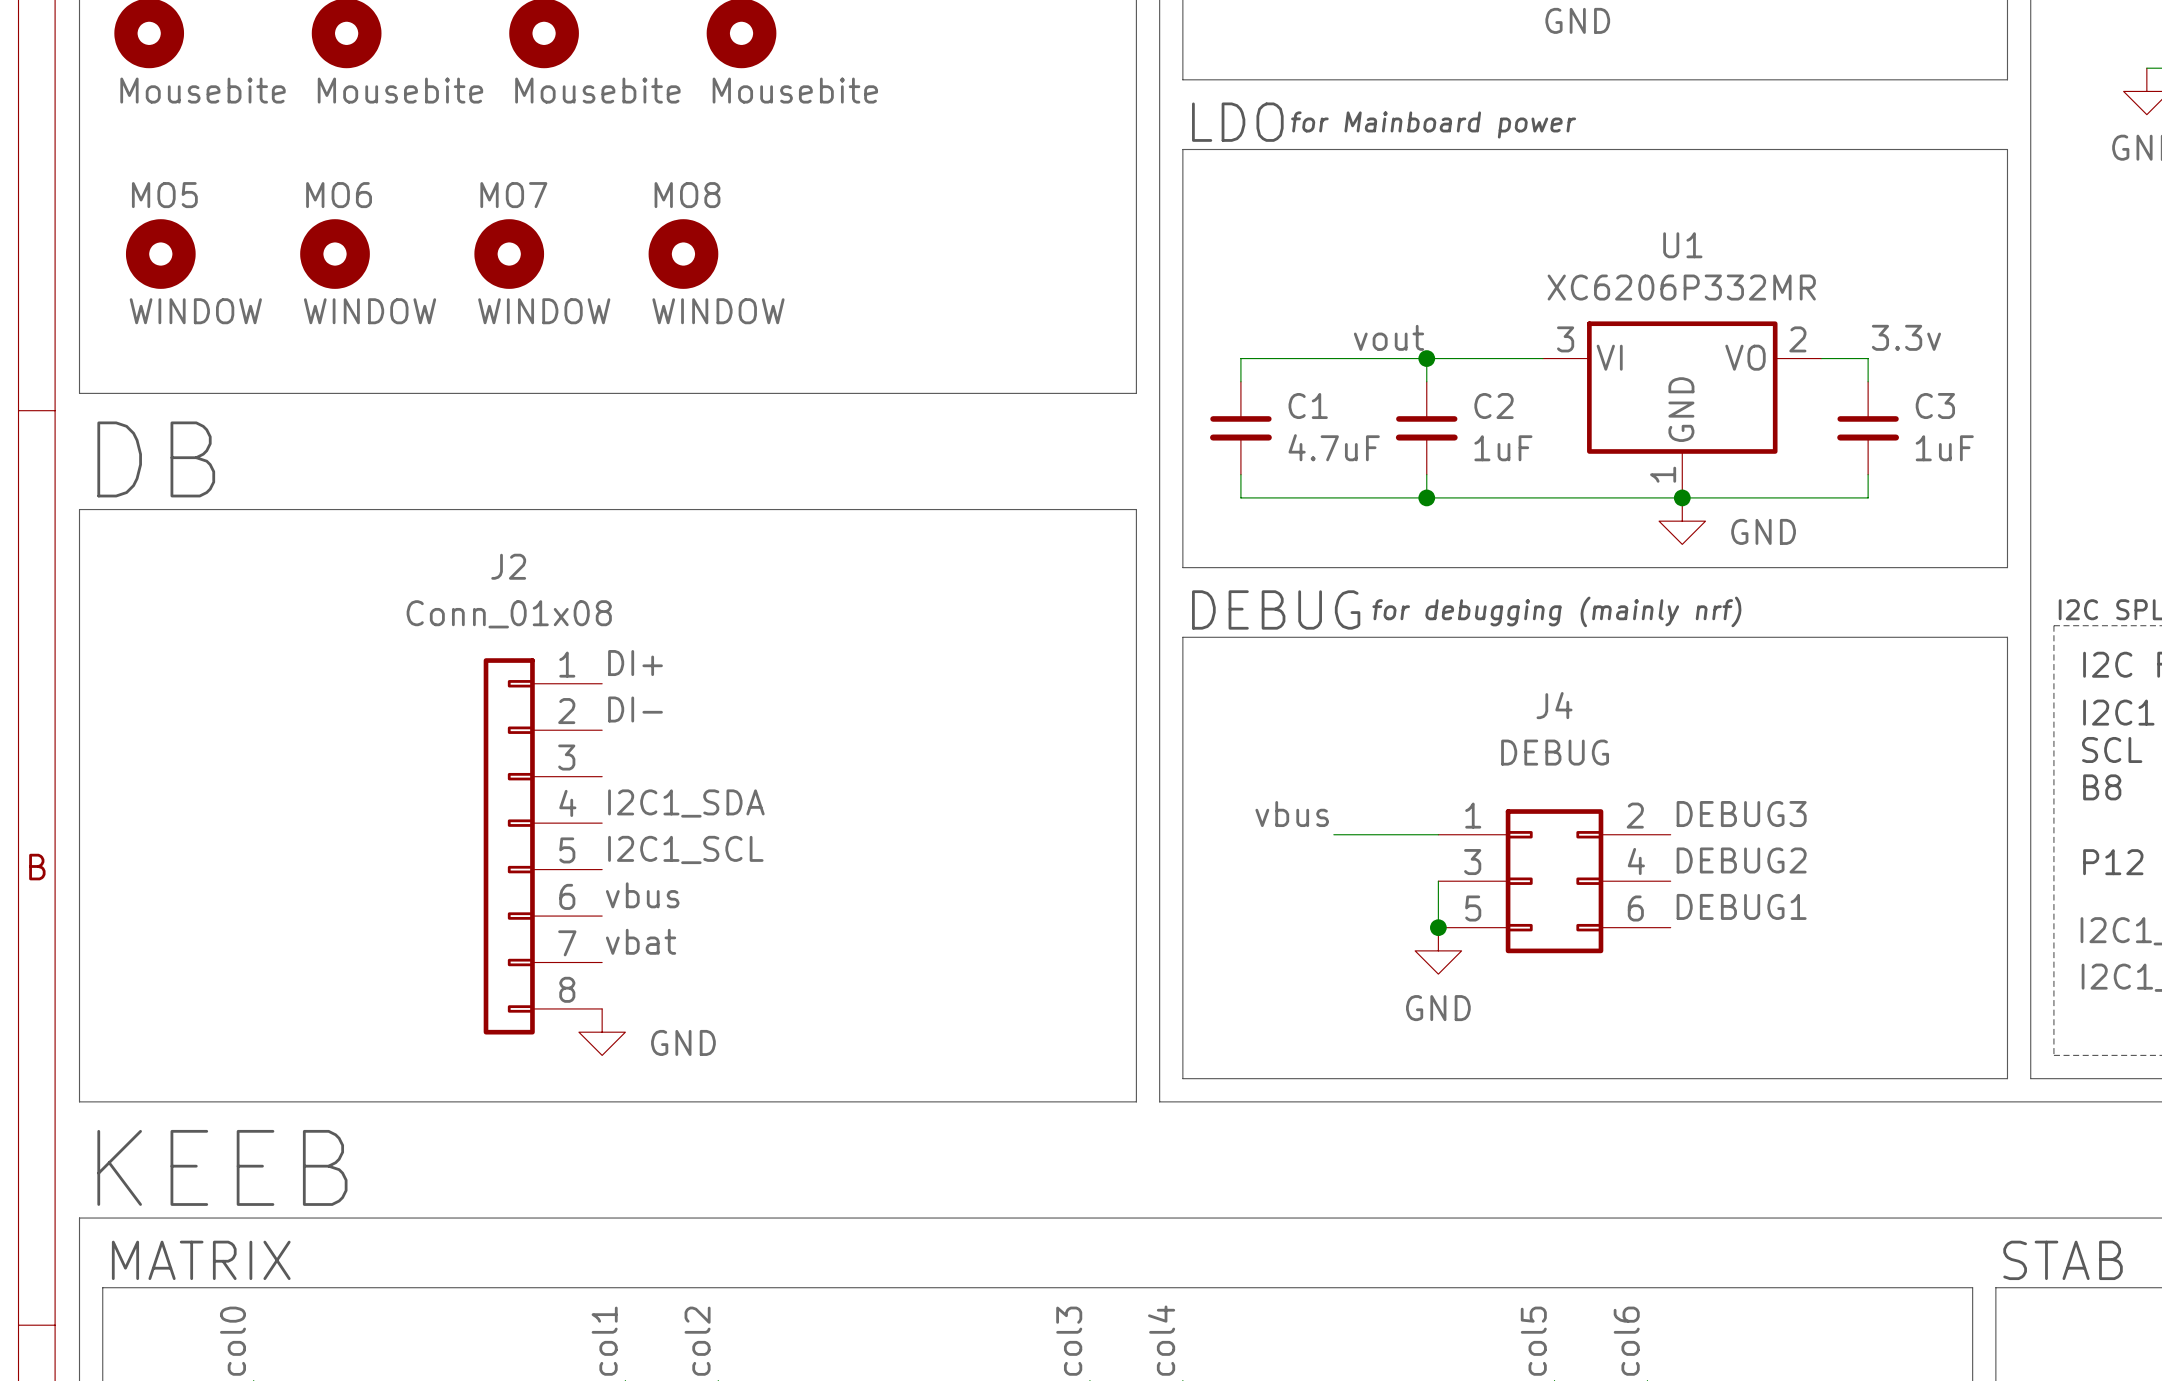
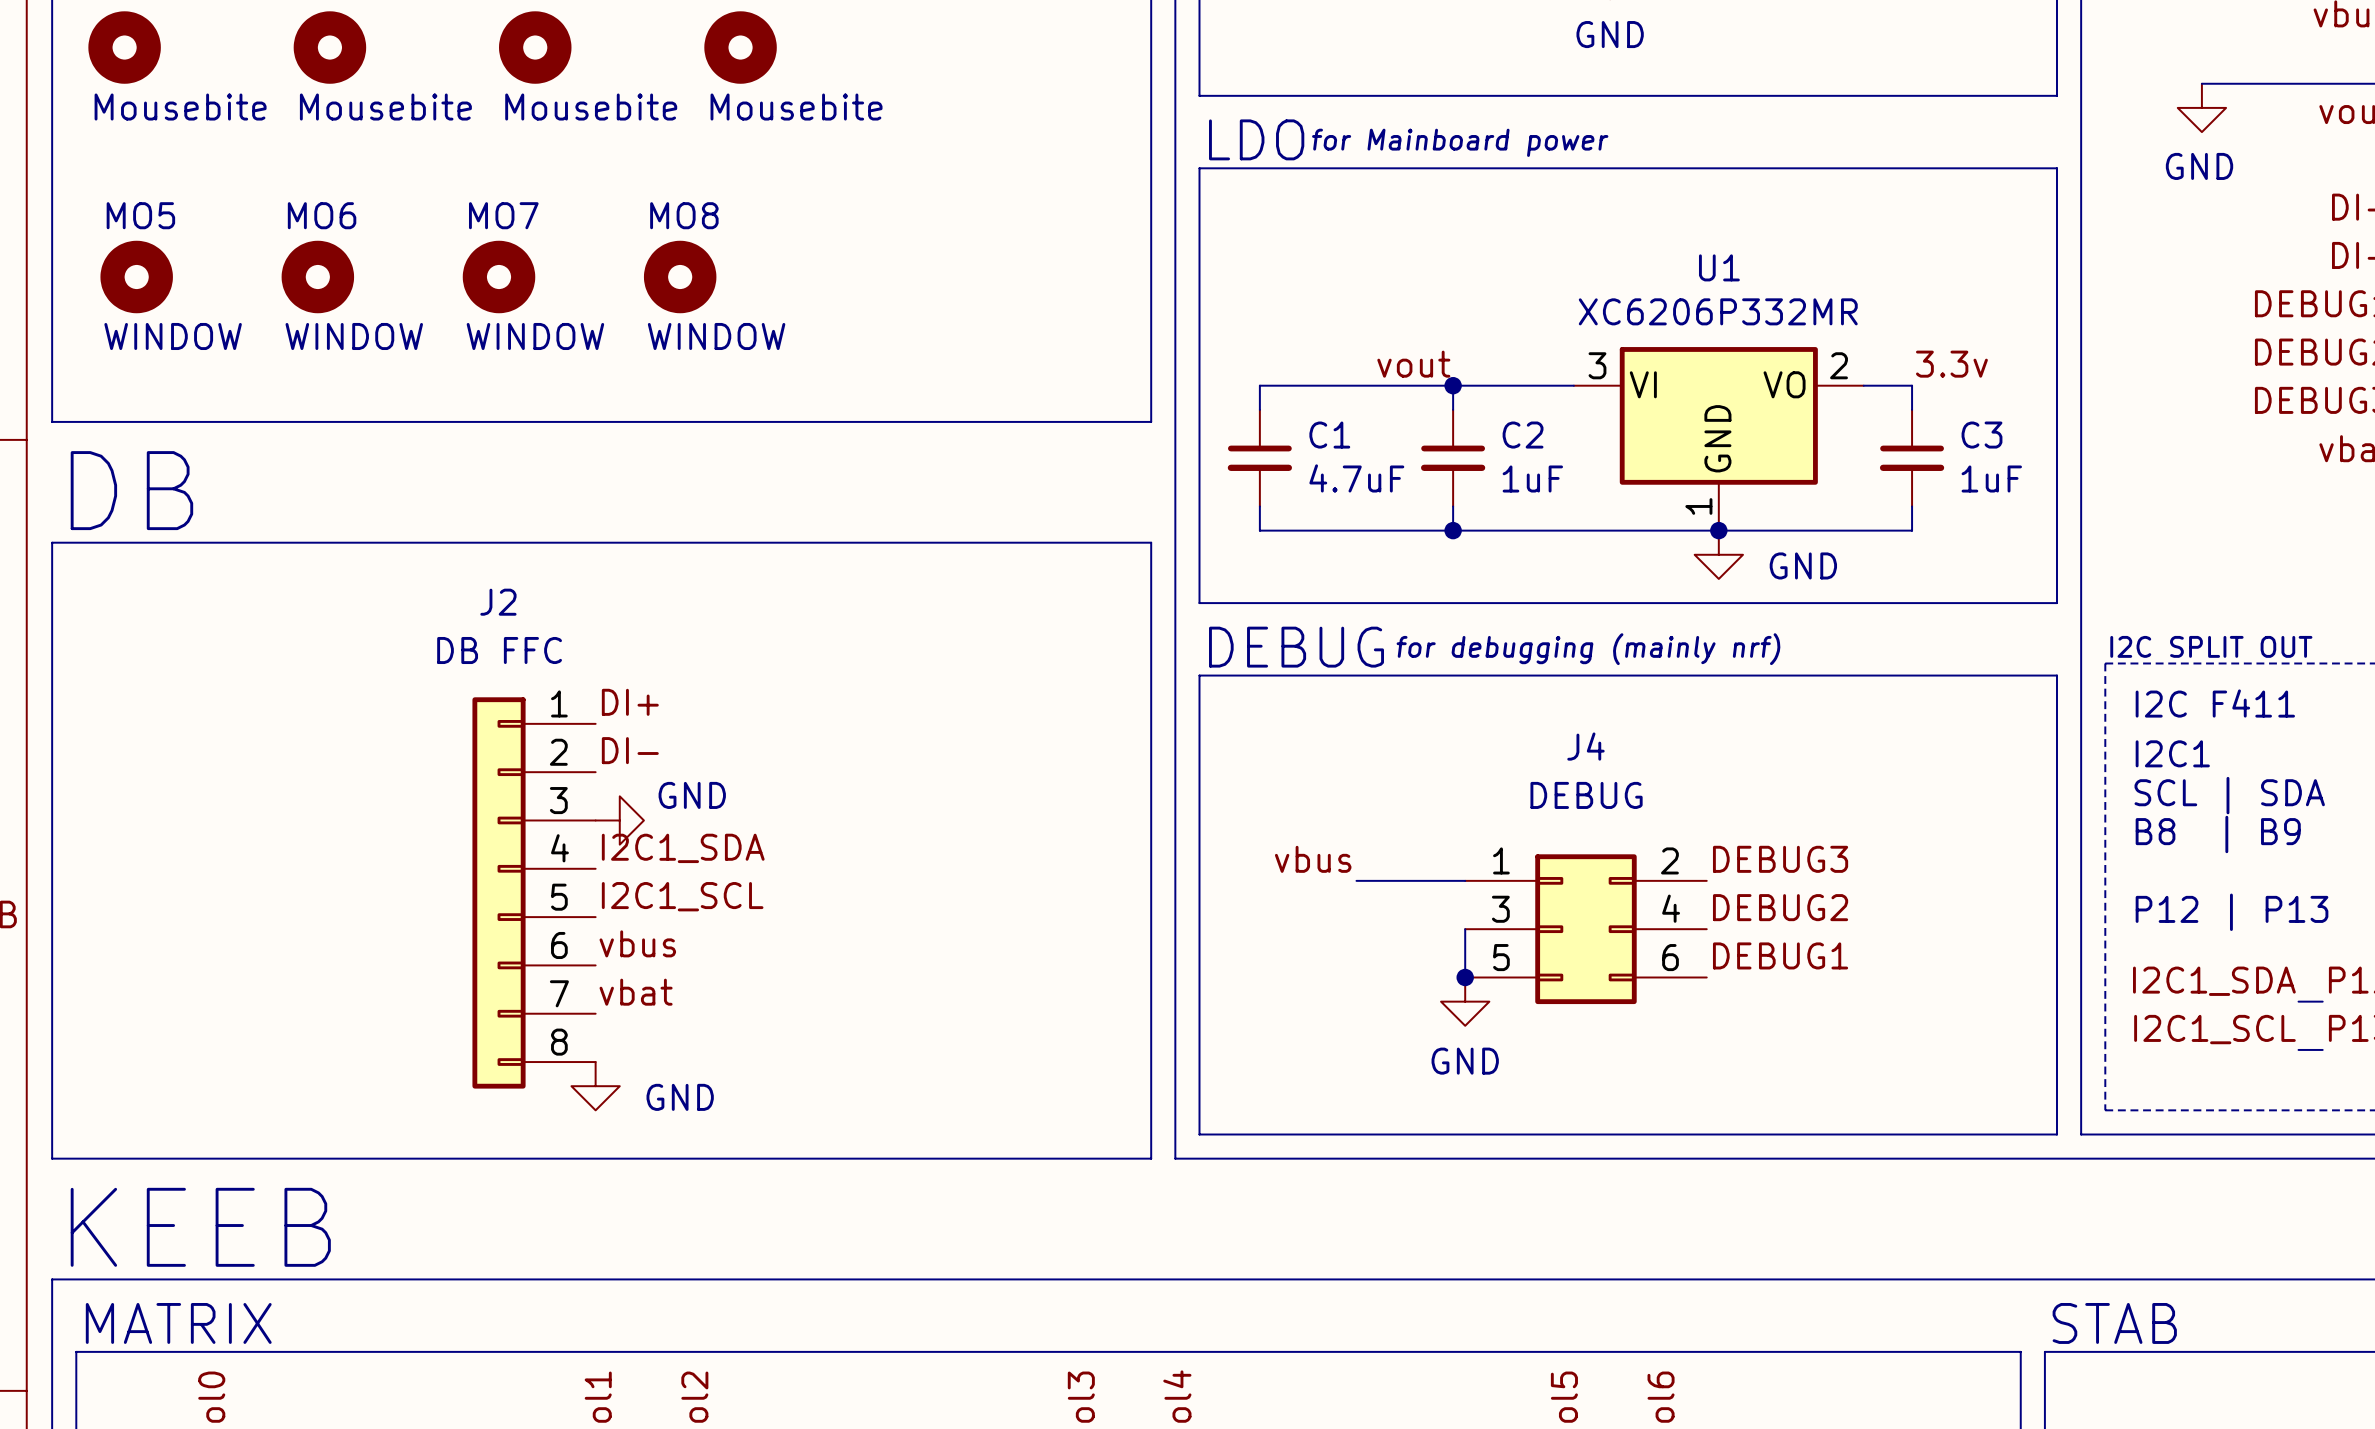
J2 value: Conn_01x08 (509, 614) -> DB FFC (499, 650)
power symbol: none -> GND (619, 820)

